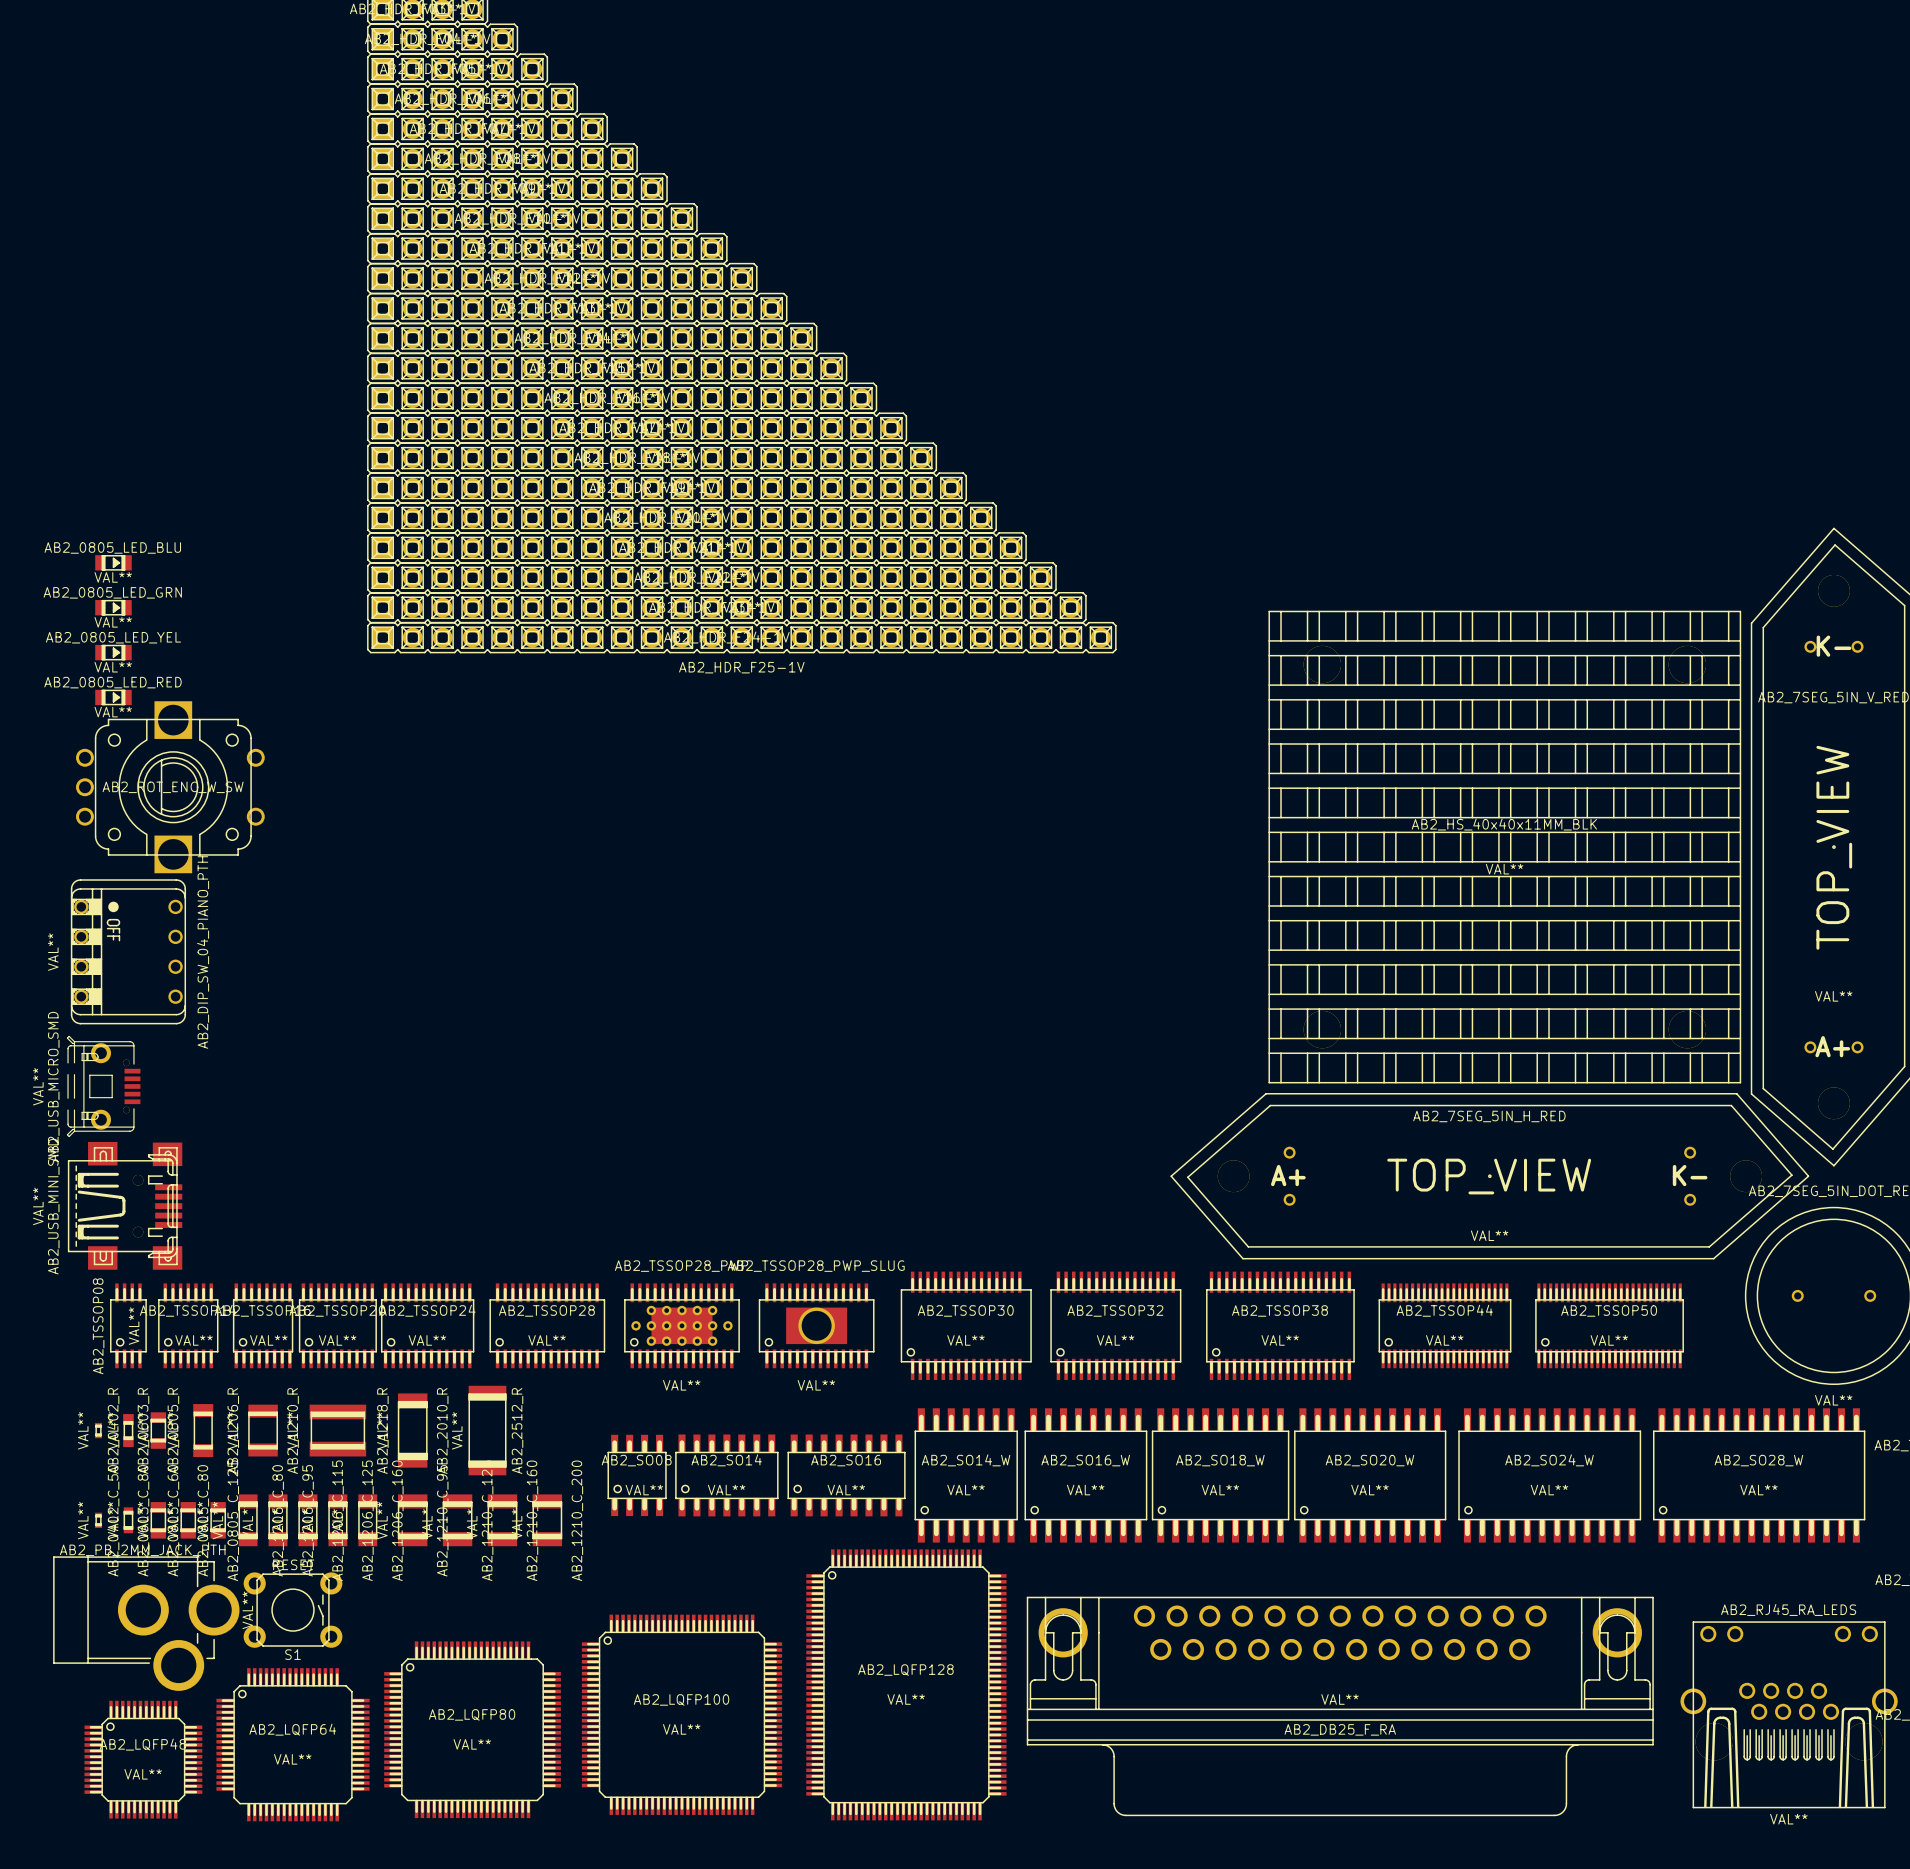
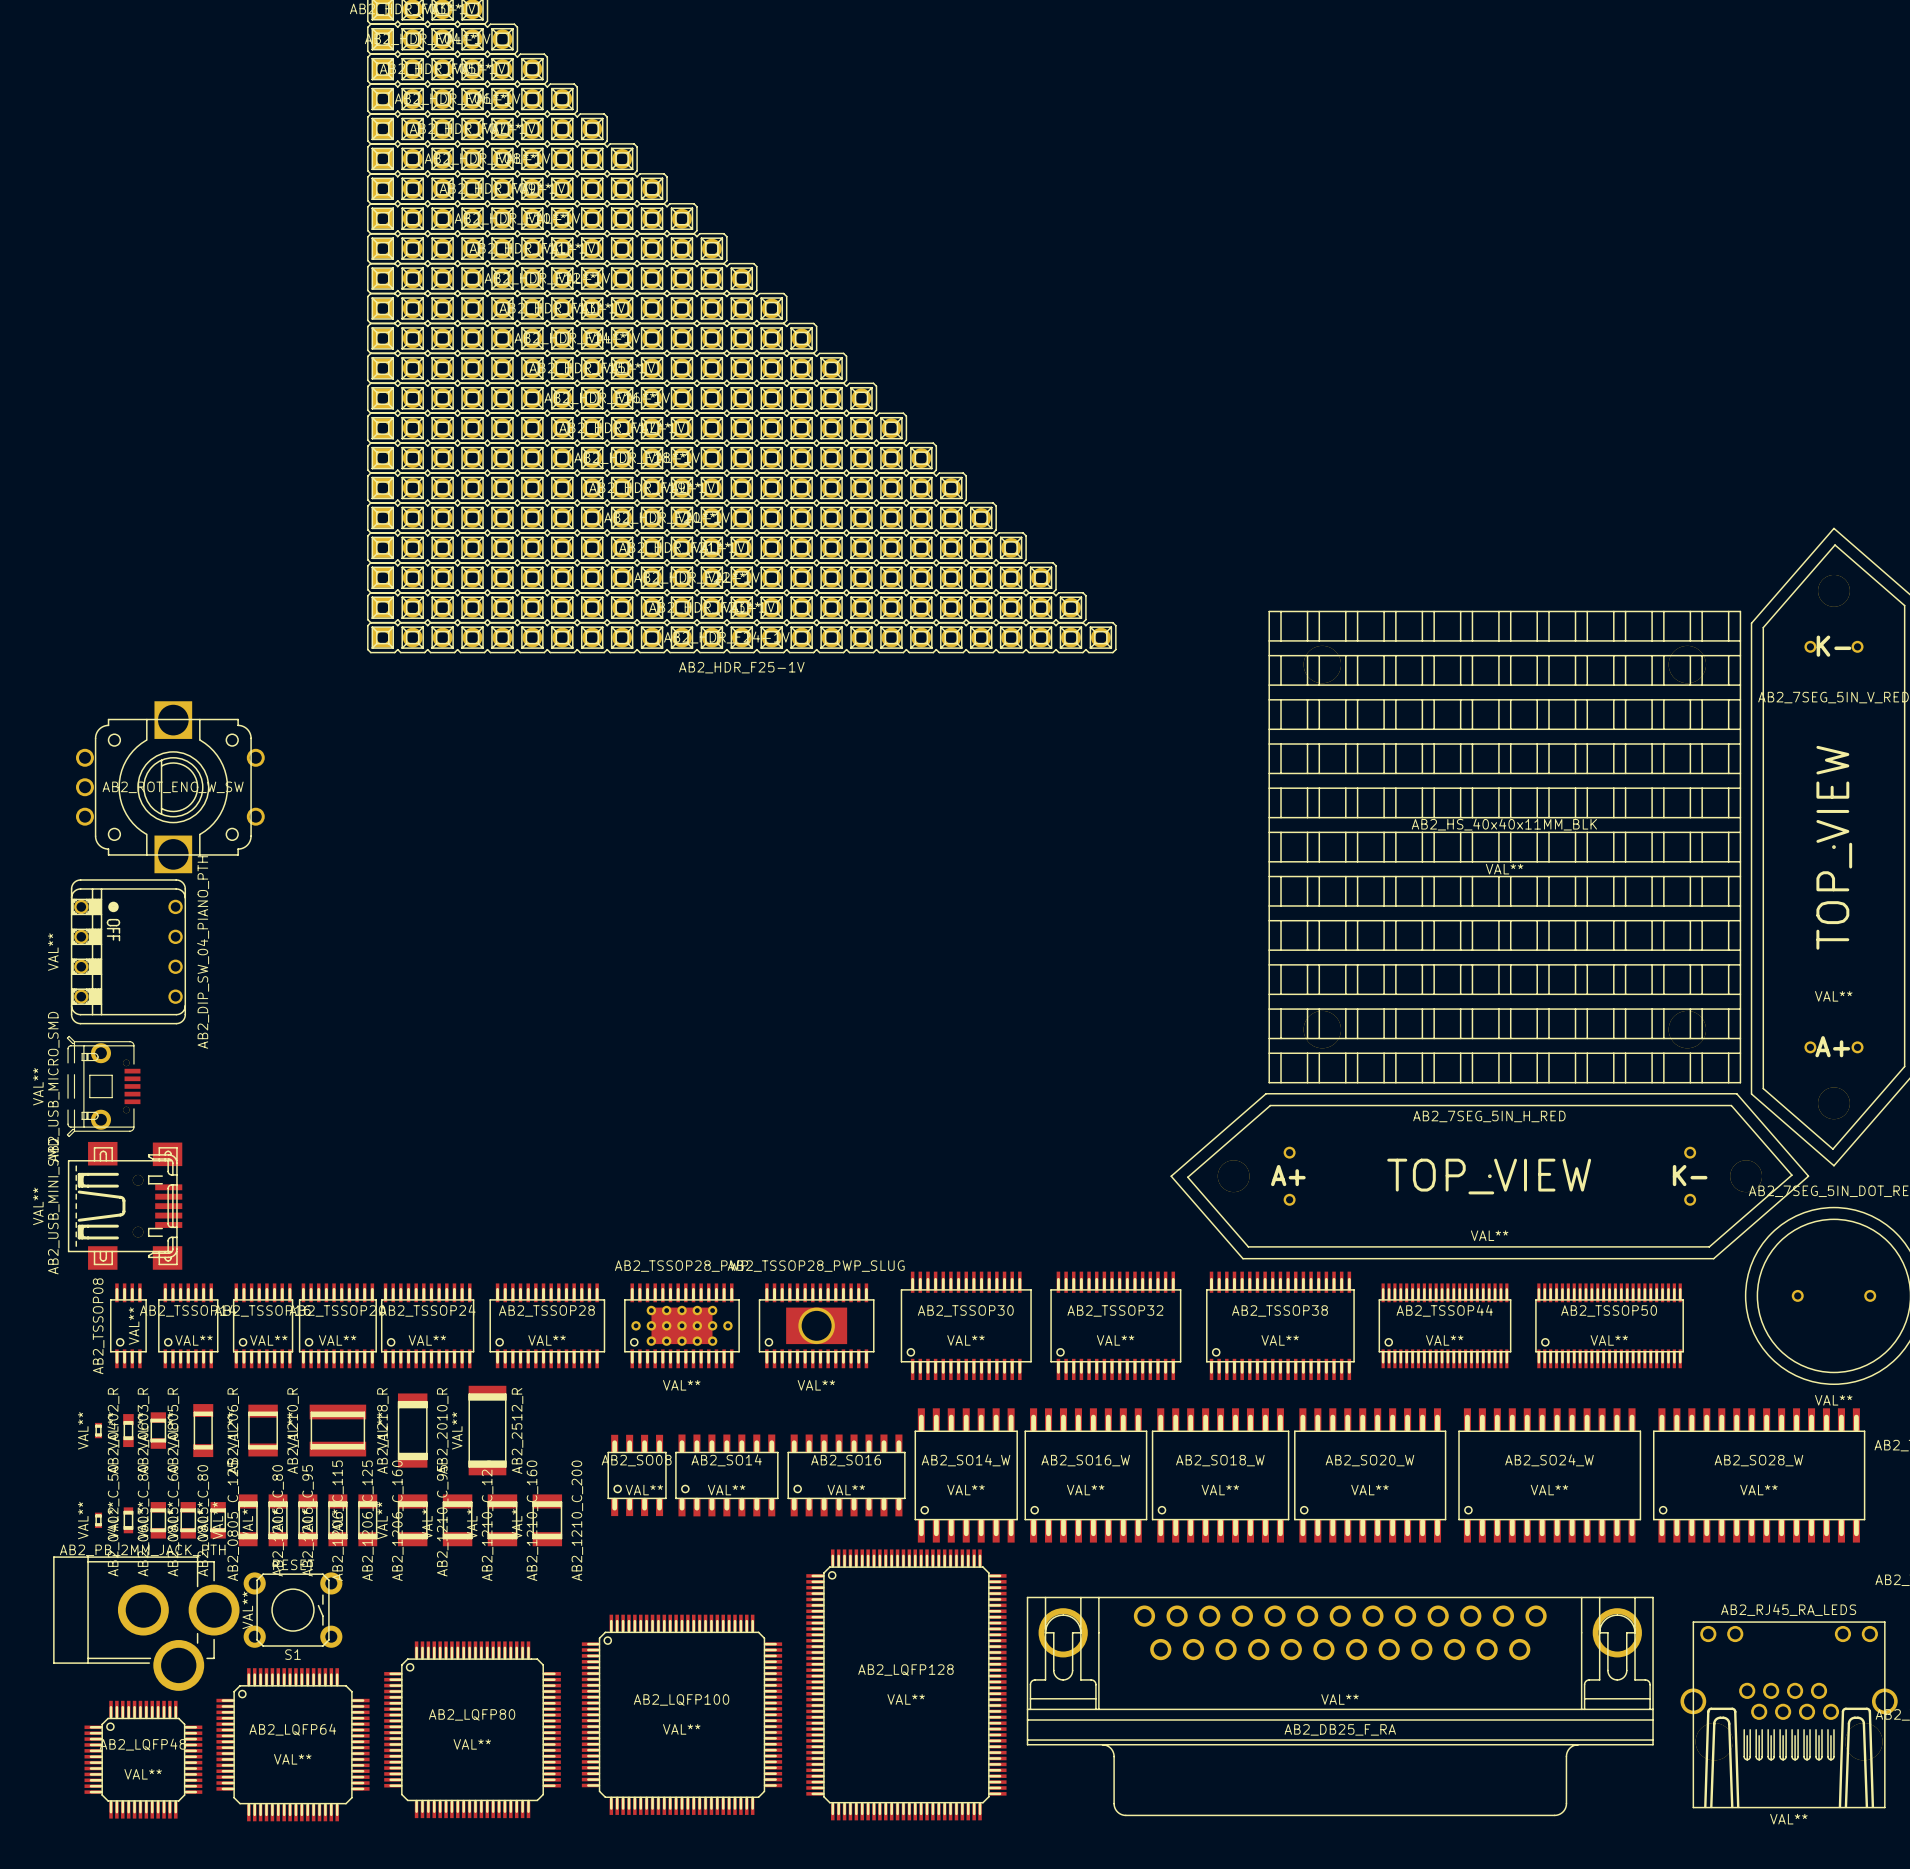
AB2_0805_LED_BLU: VAL** (113, 562) -> none
AB2_0805_LED_GRN: VAL** (113, 607) -> none
AB2_0805_LED_YEL: VAL** (113, 652) -> none
AB2_0805_LED_RED: VAL** (113, 697) -> none

